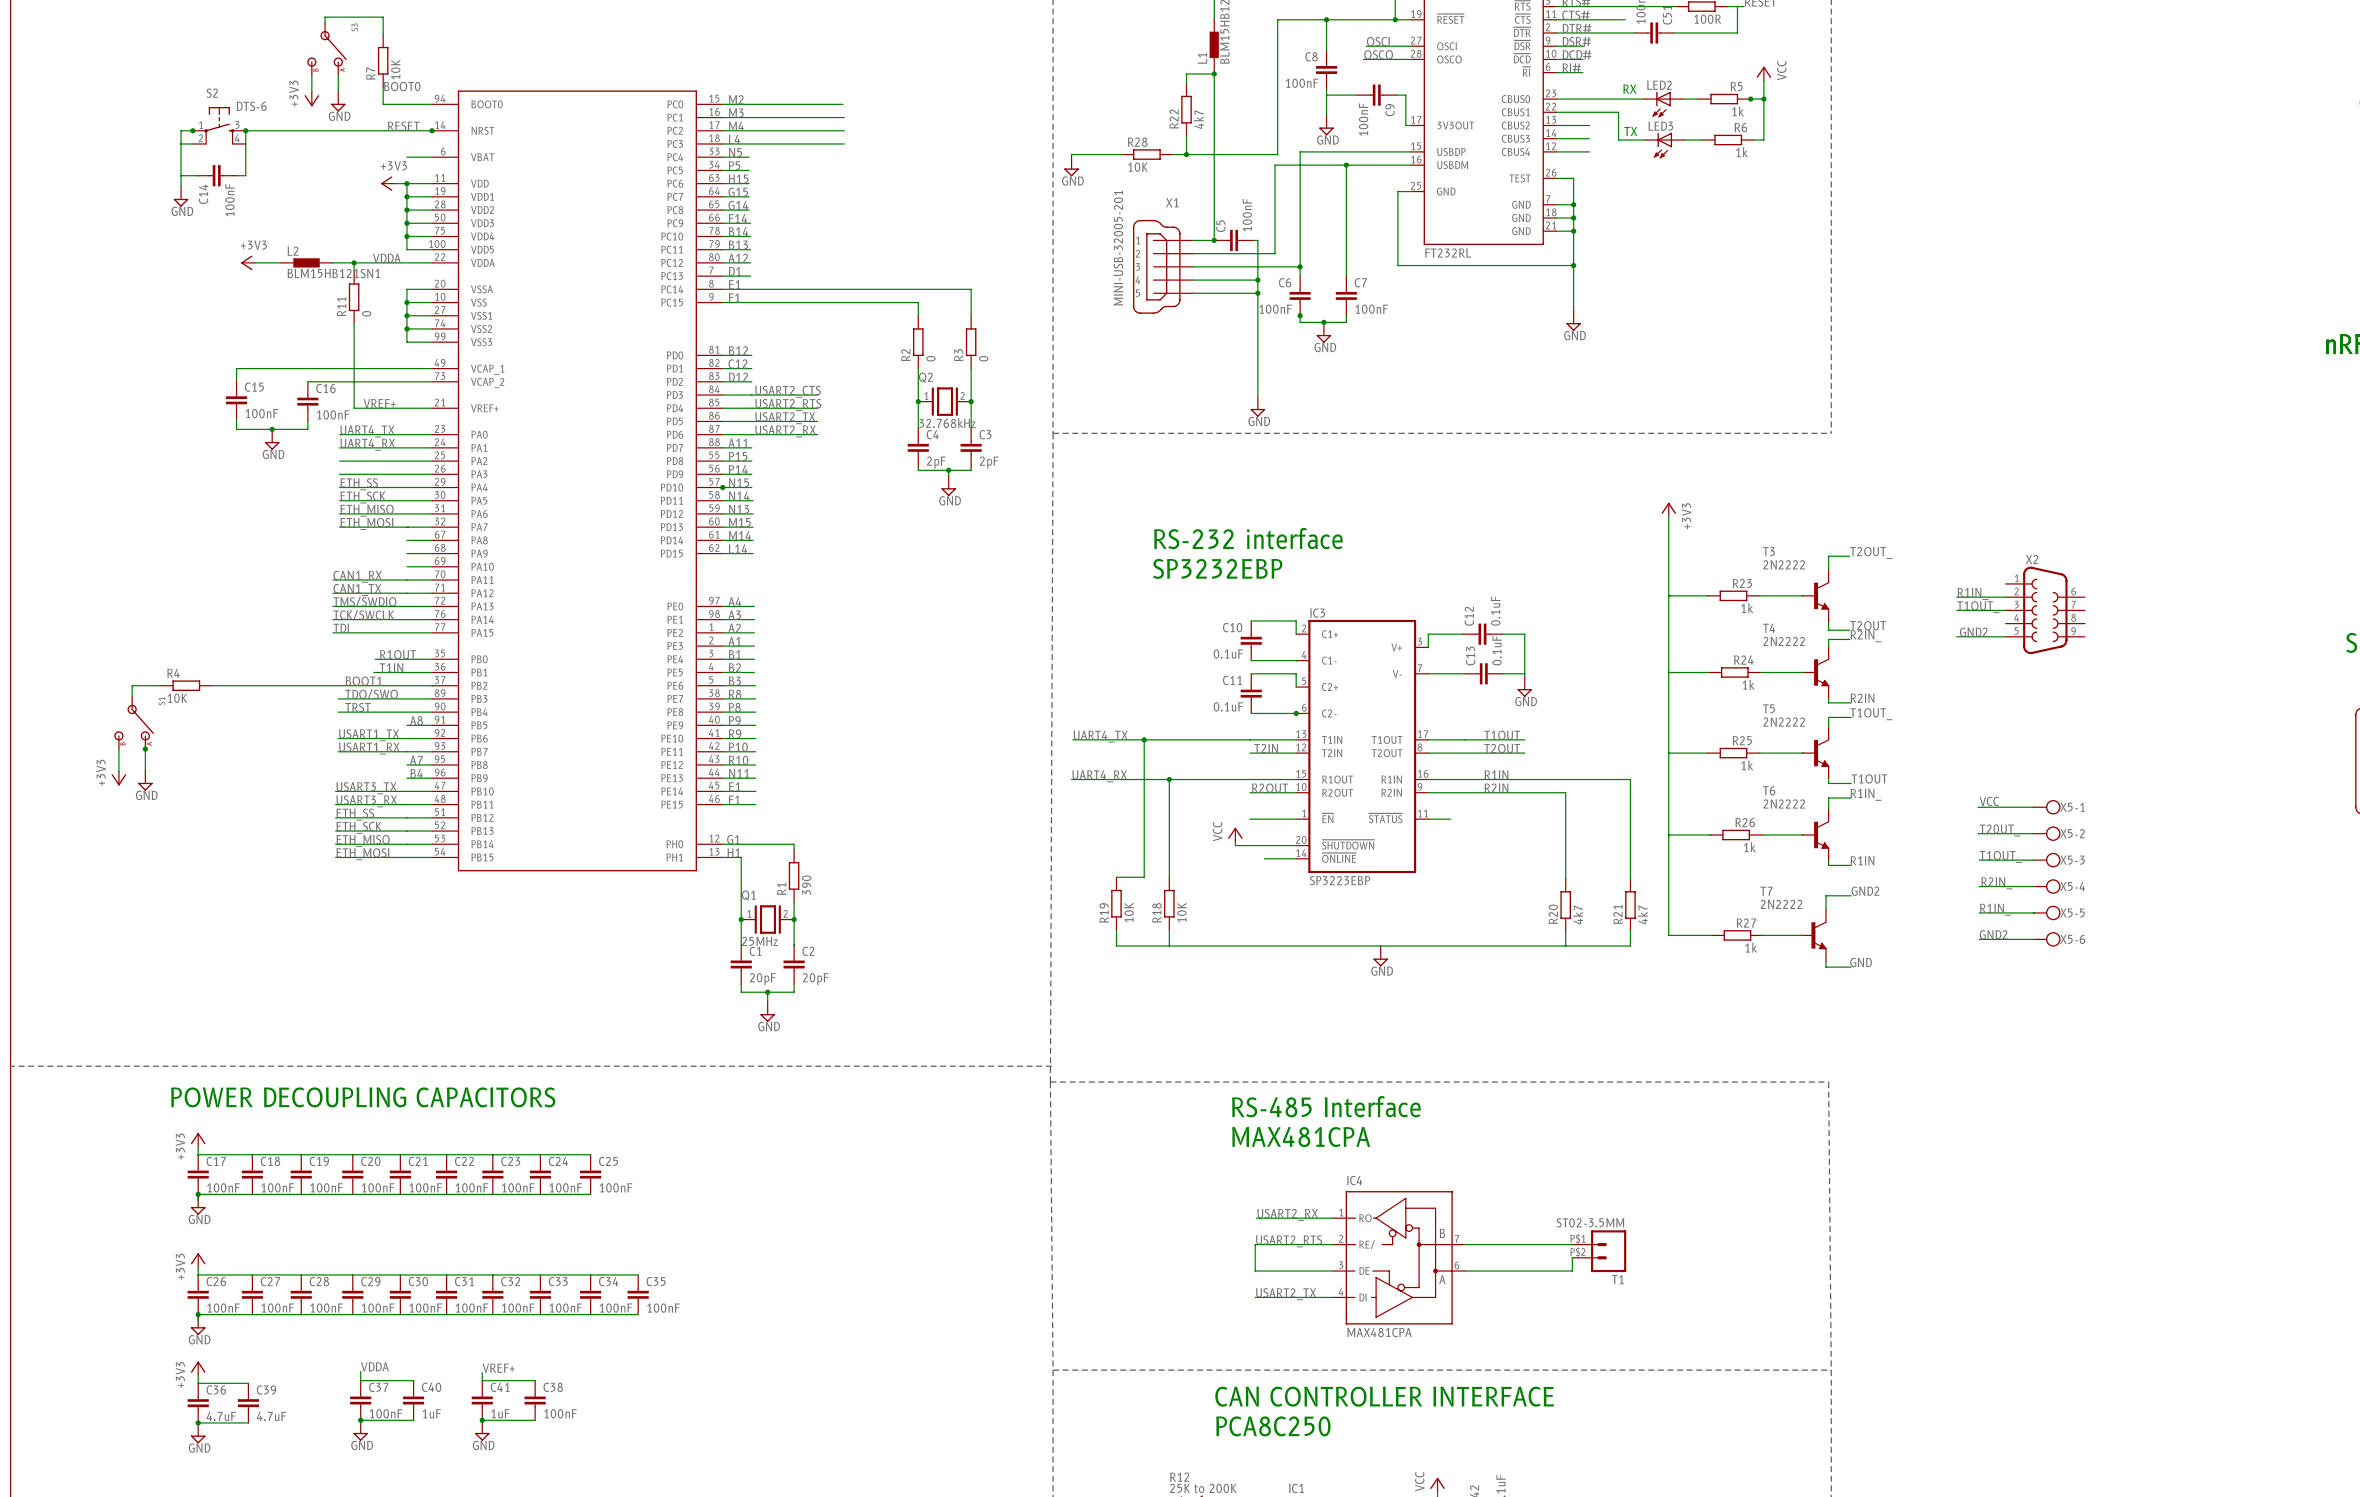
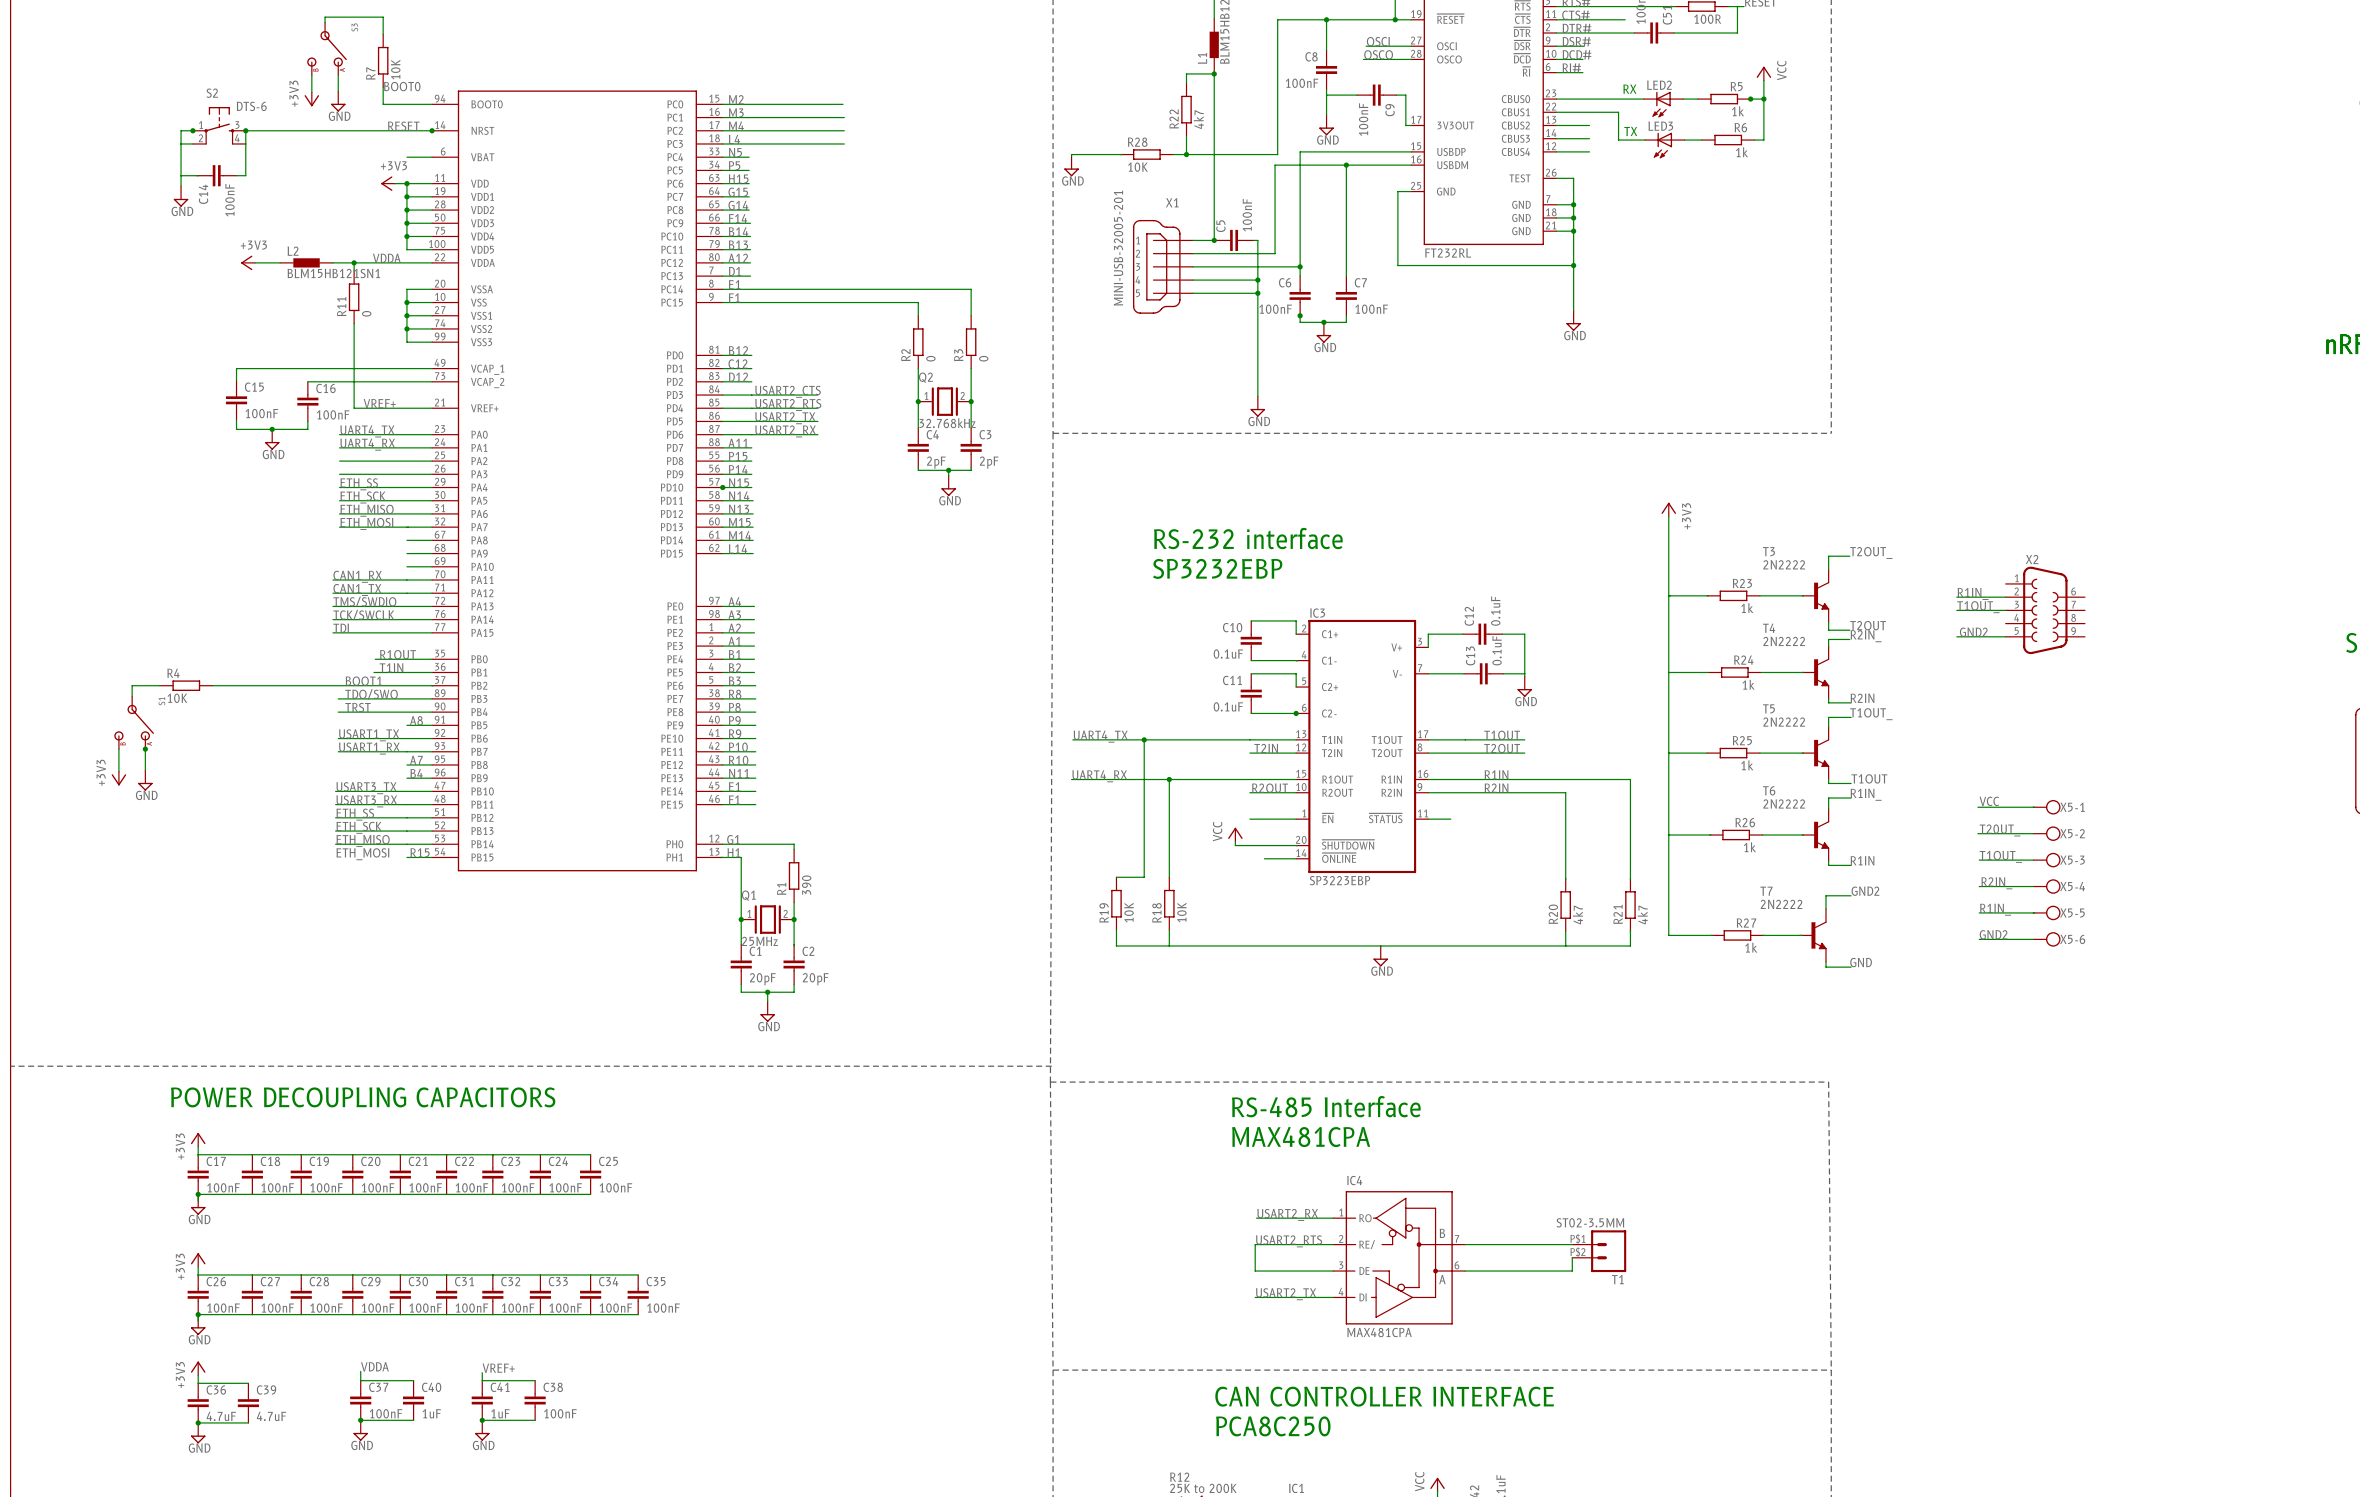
label: none -> R15 (420, 852)
wire: (335, 857) (406, 857) -> none

